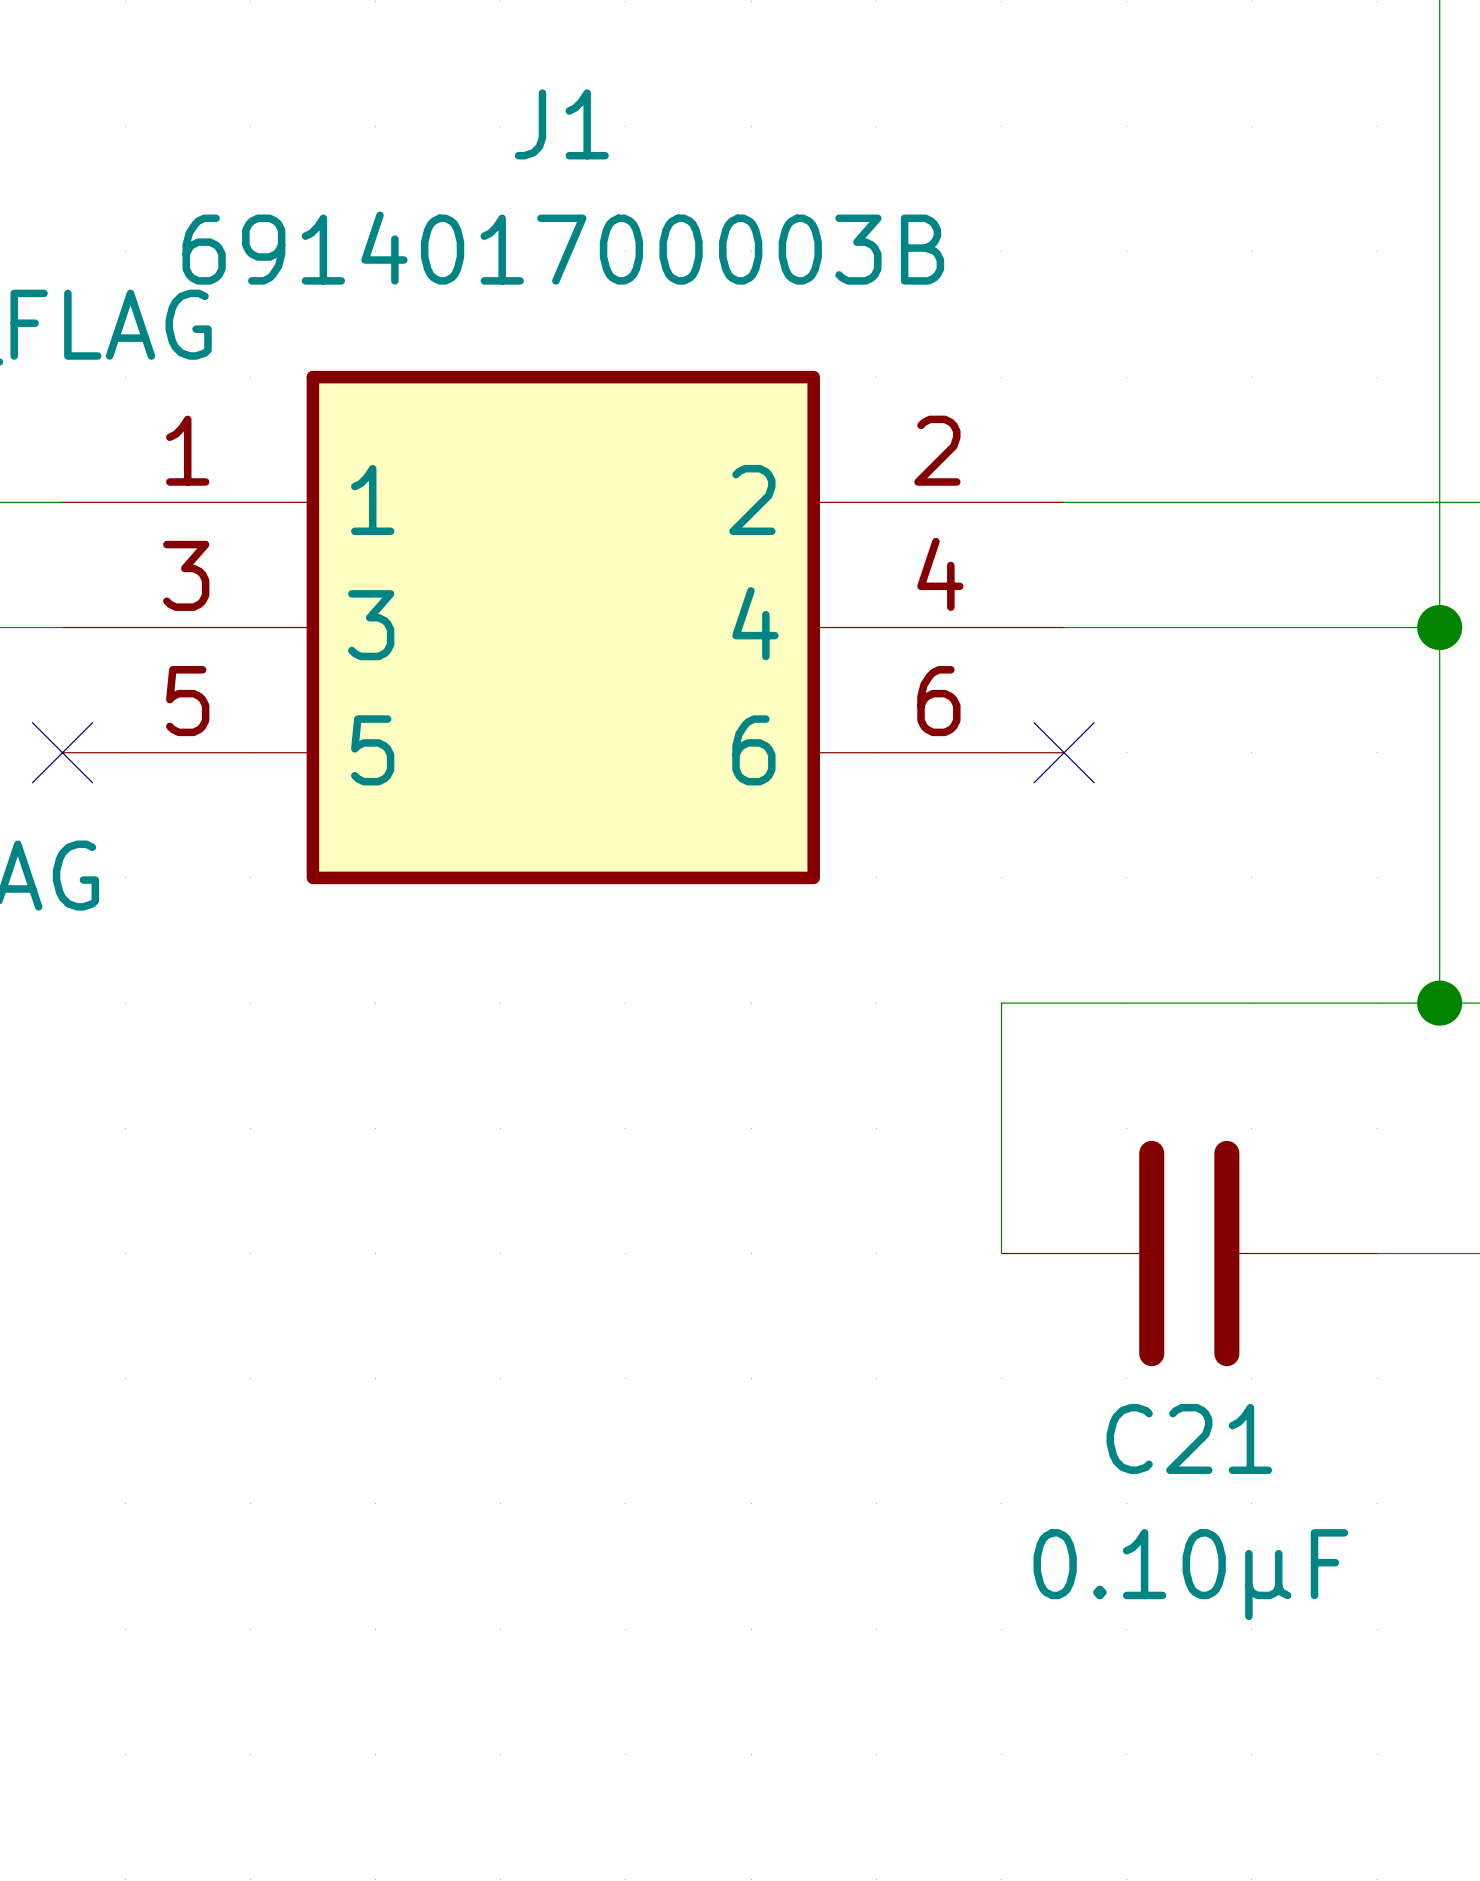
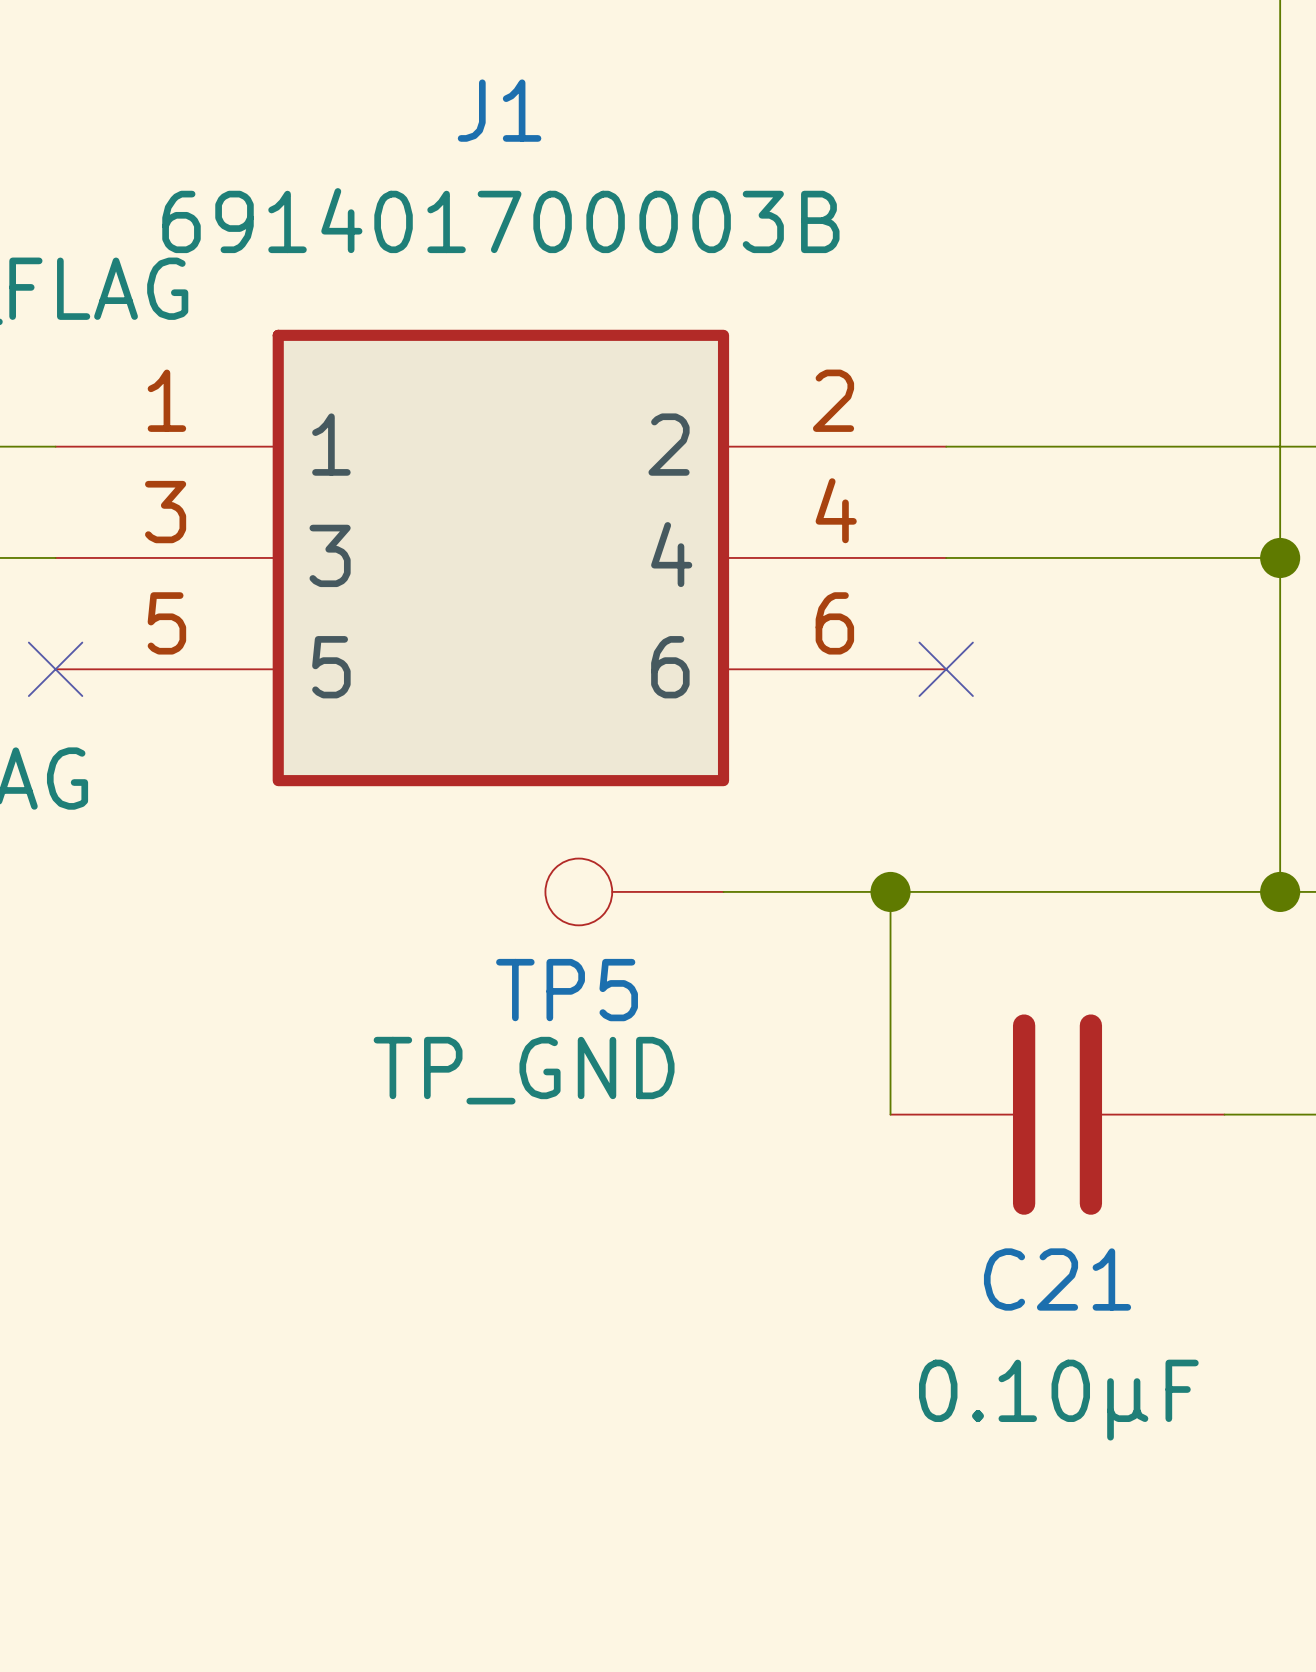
TP5: none -> TP_GND (634, 891)
wire: none -> (723, 891) (890, 891)
junction: none -> (890, 891)

